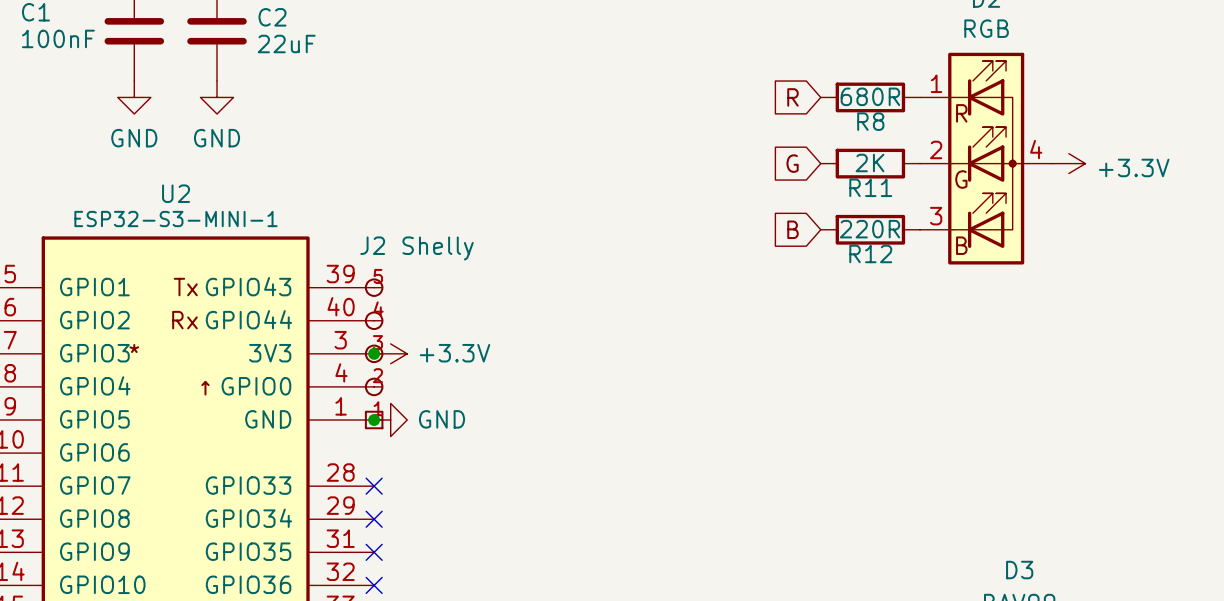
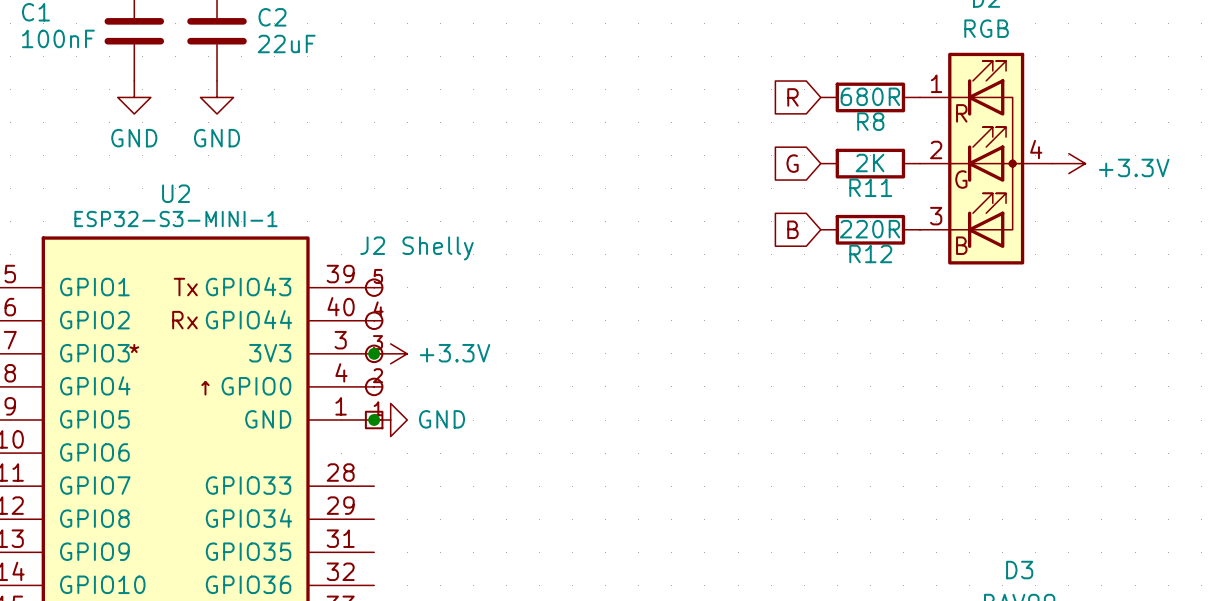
no-connect mark: (374, 486) -> none
no-connect mark: (374, 519) -> none
no-connect mark: (374, 552) -> none
no-connect mark: (374, 585) -> none

